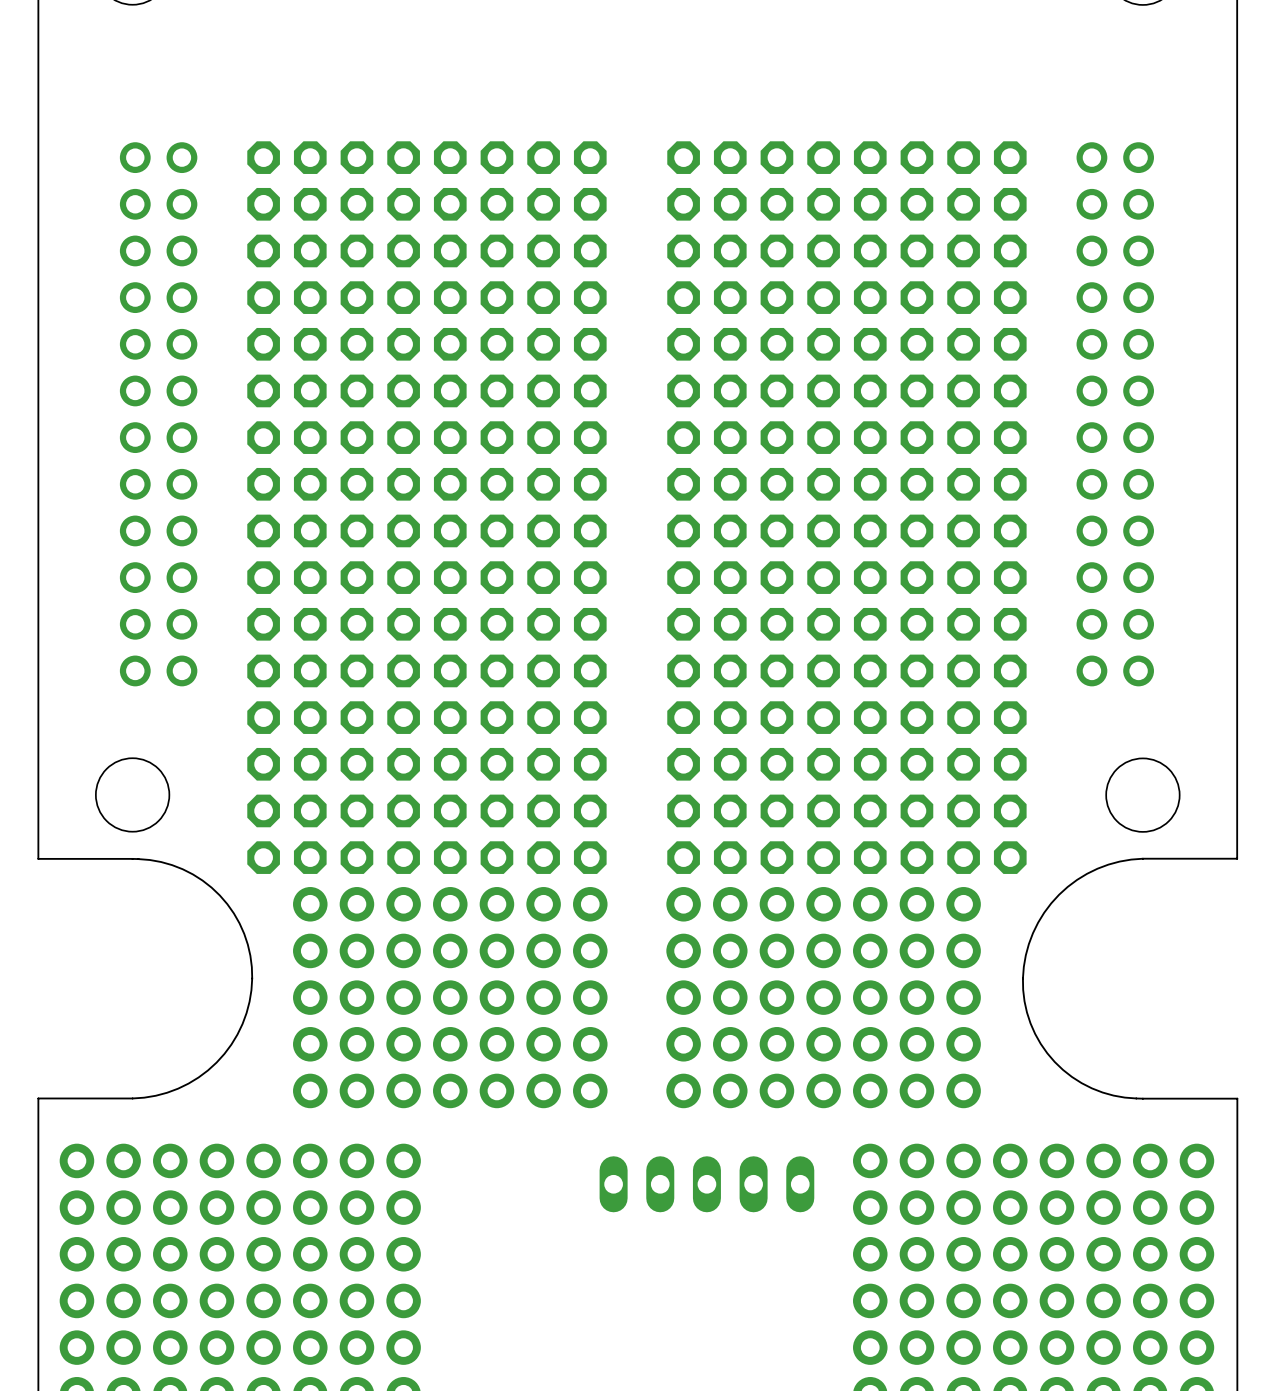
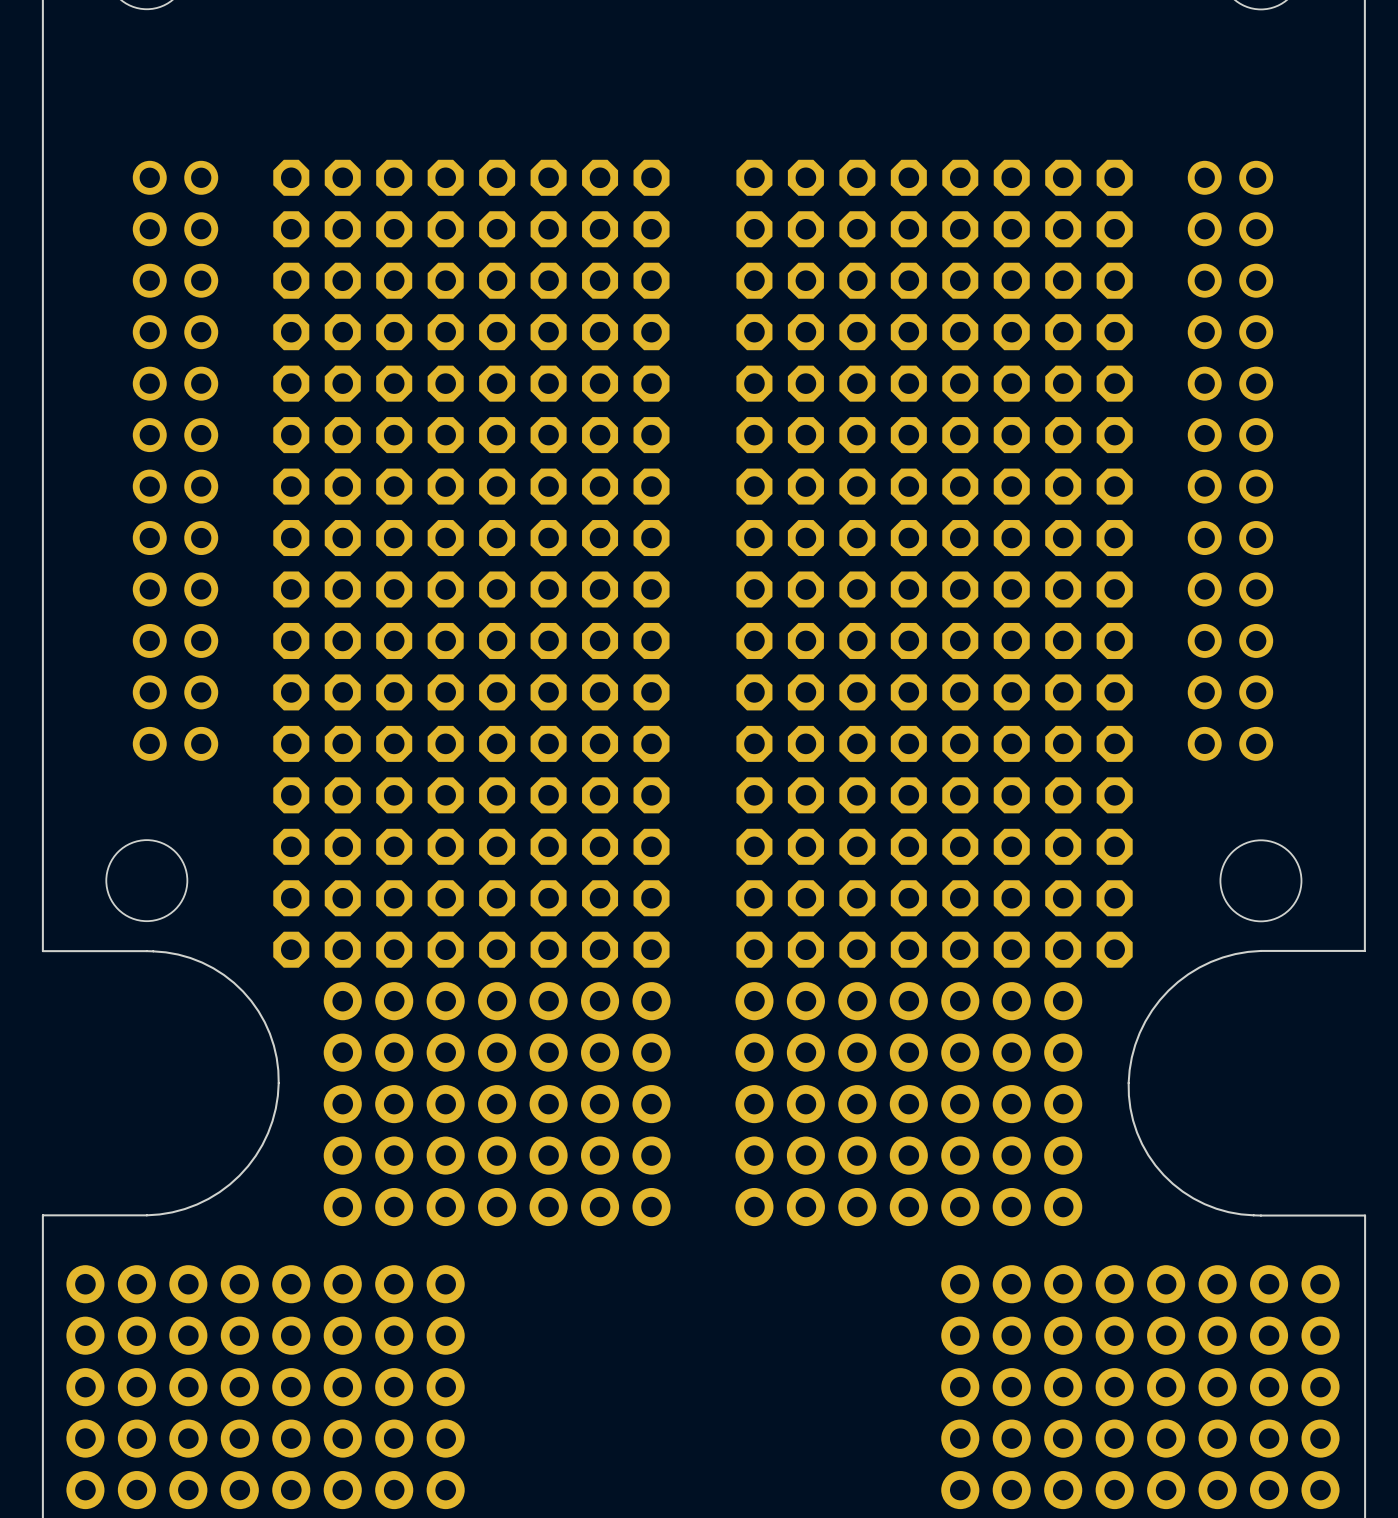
part: (706, 1184) -> none

